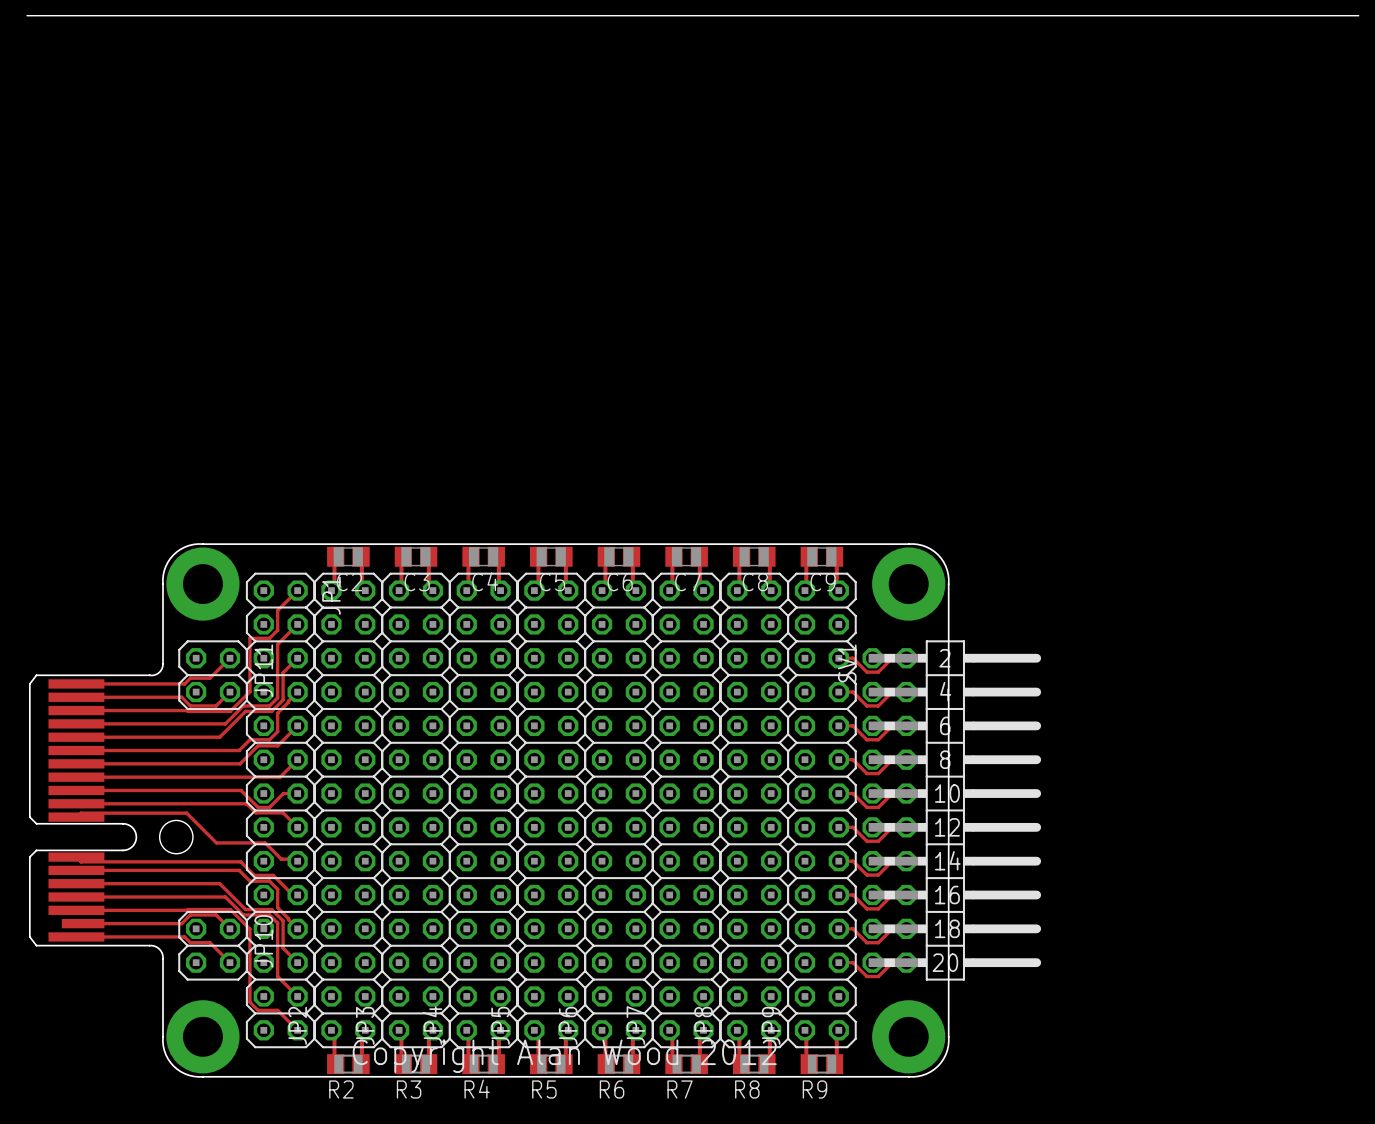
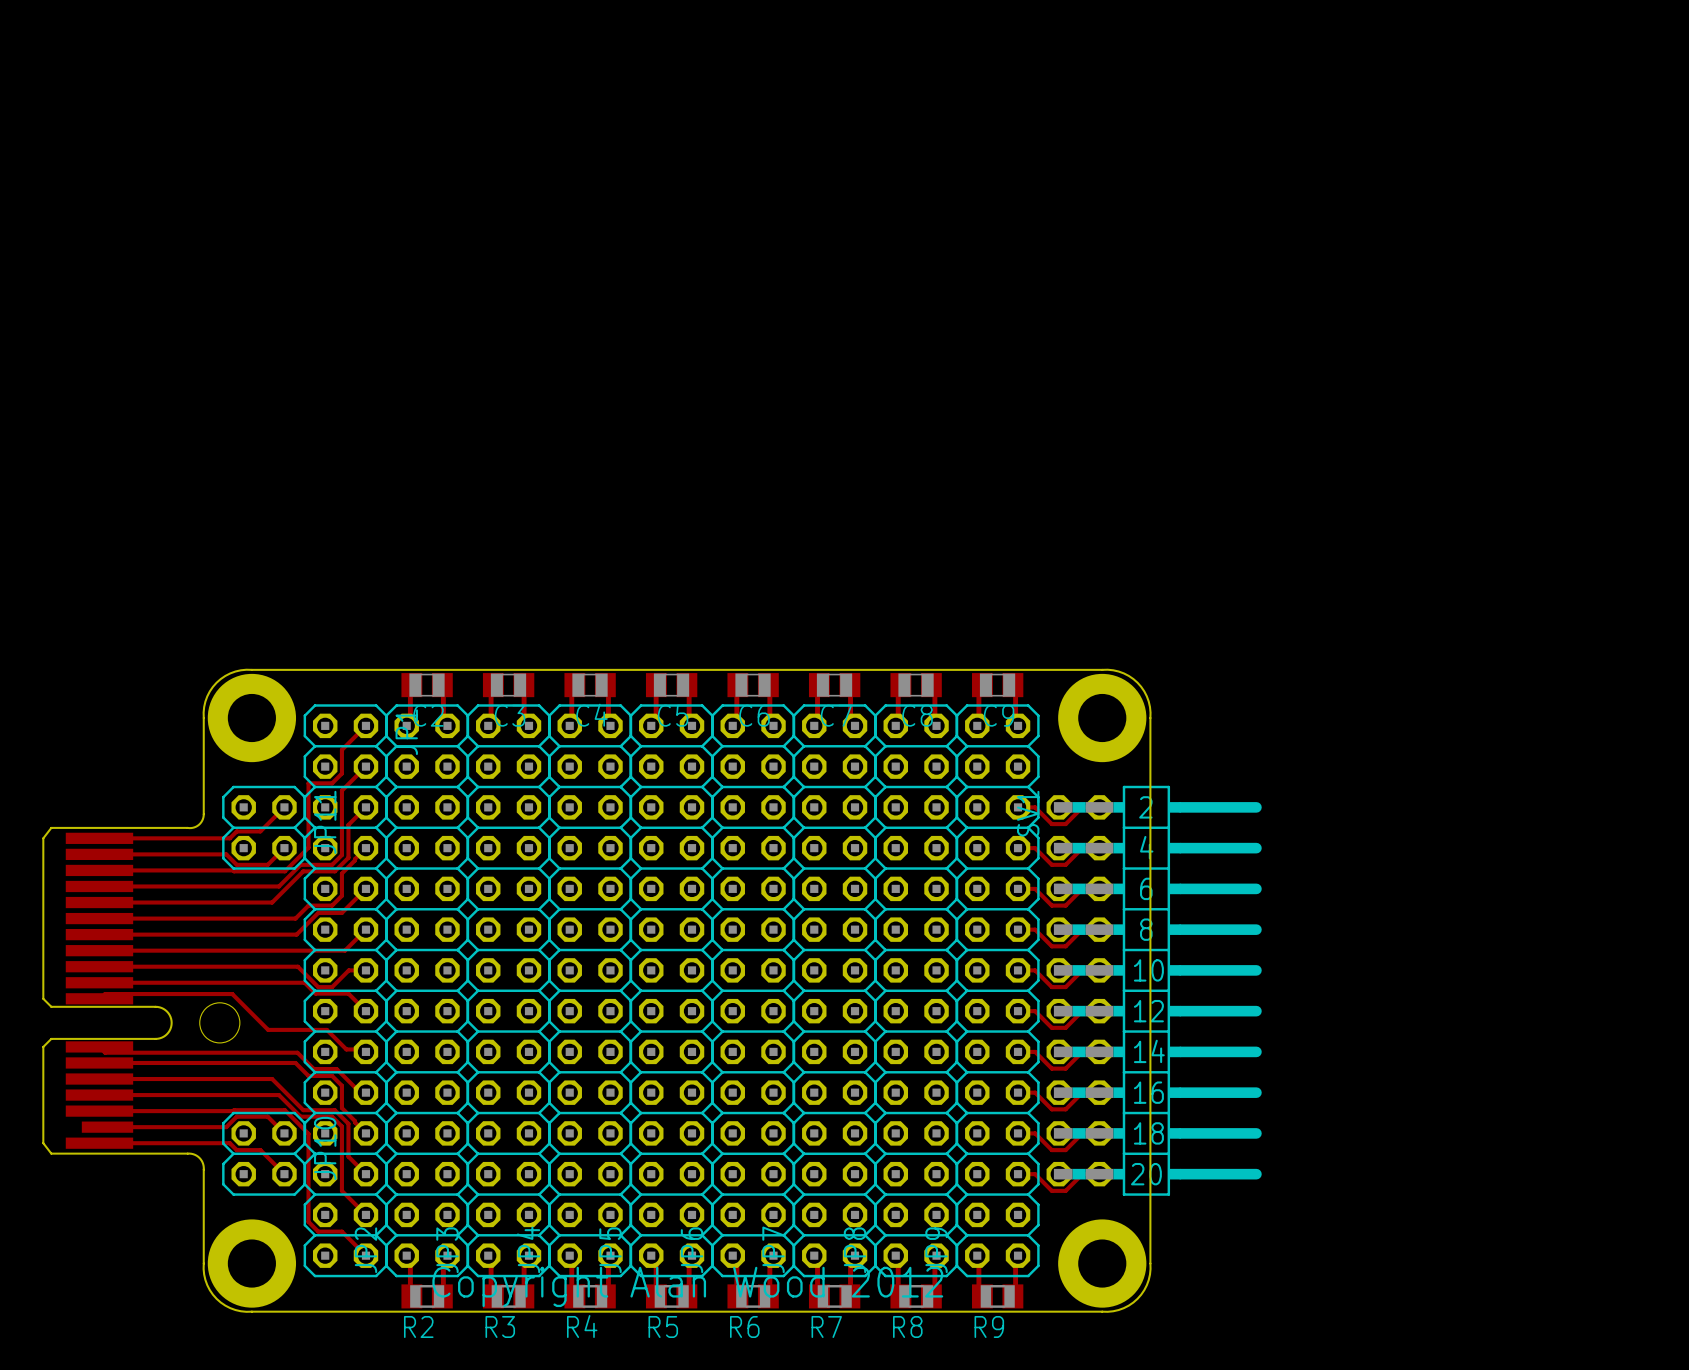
board edge: (27, 15) (1358, 15) -> none

